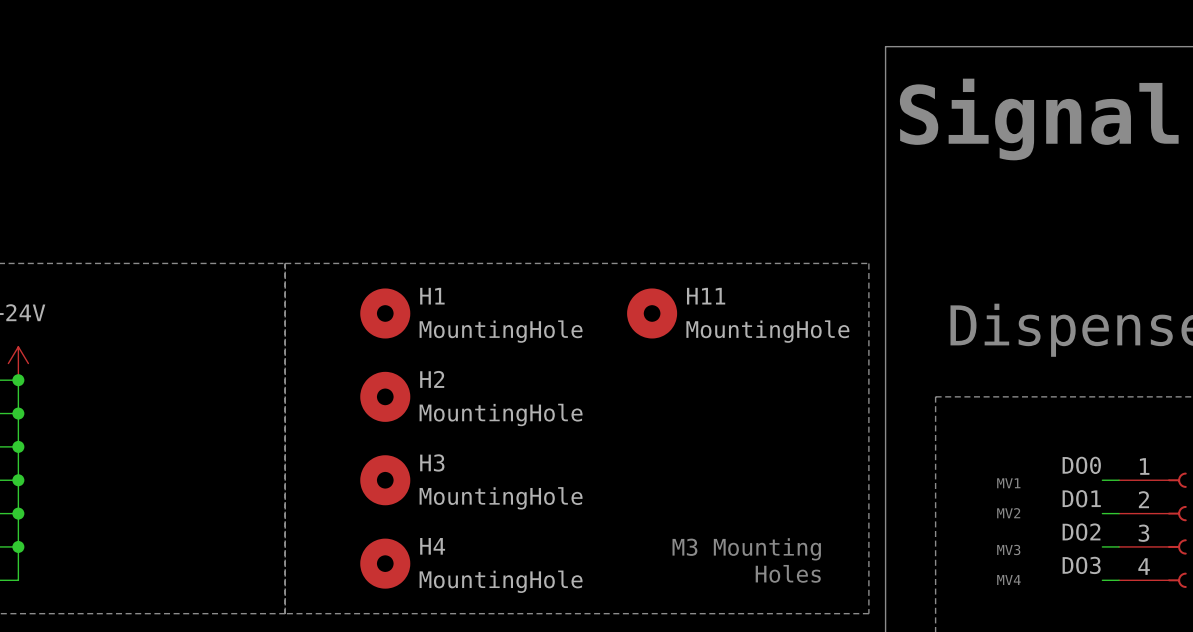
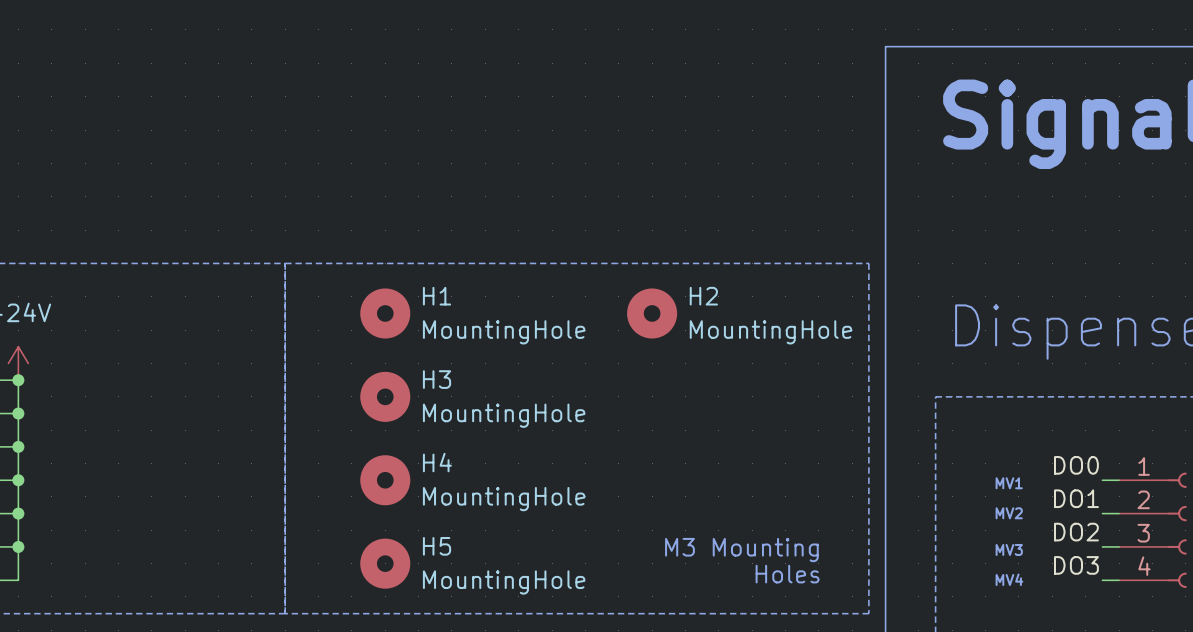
H11 name: H11 (706, 296) -> H2 (703, 296)
H2 name: H2 (432, 379) -> H3 (437, 379)
H3 name: H3 (432, 462) -> H4 (437, 462)
H4 name: H4 (432, 546) -> H5 (437, 546)

